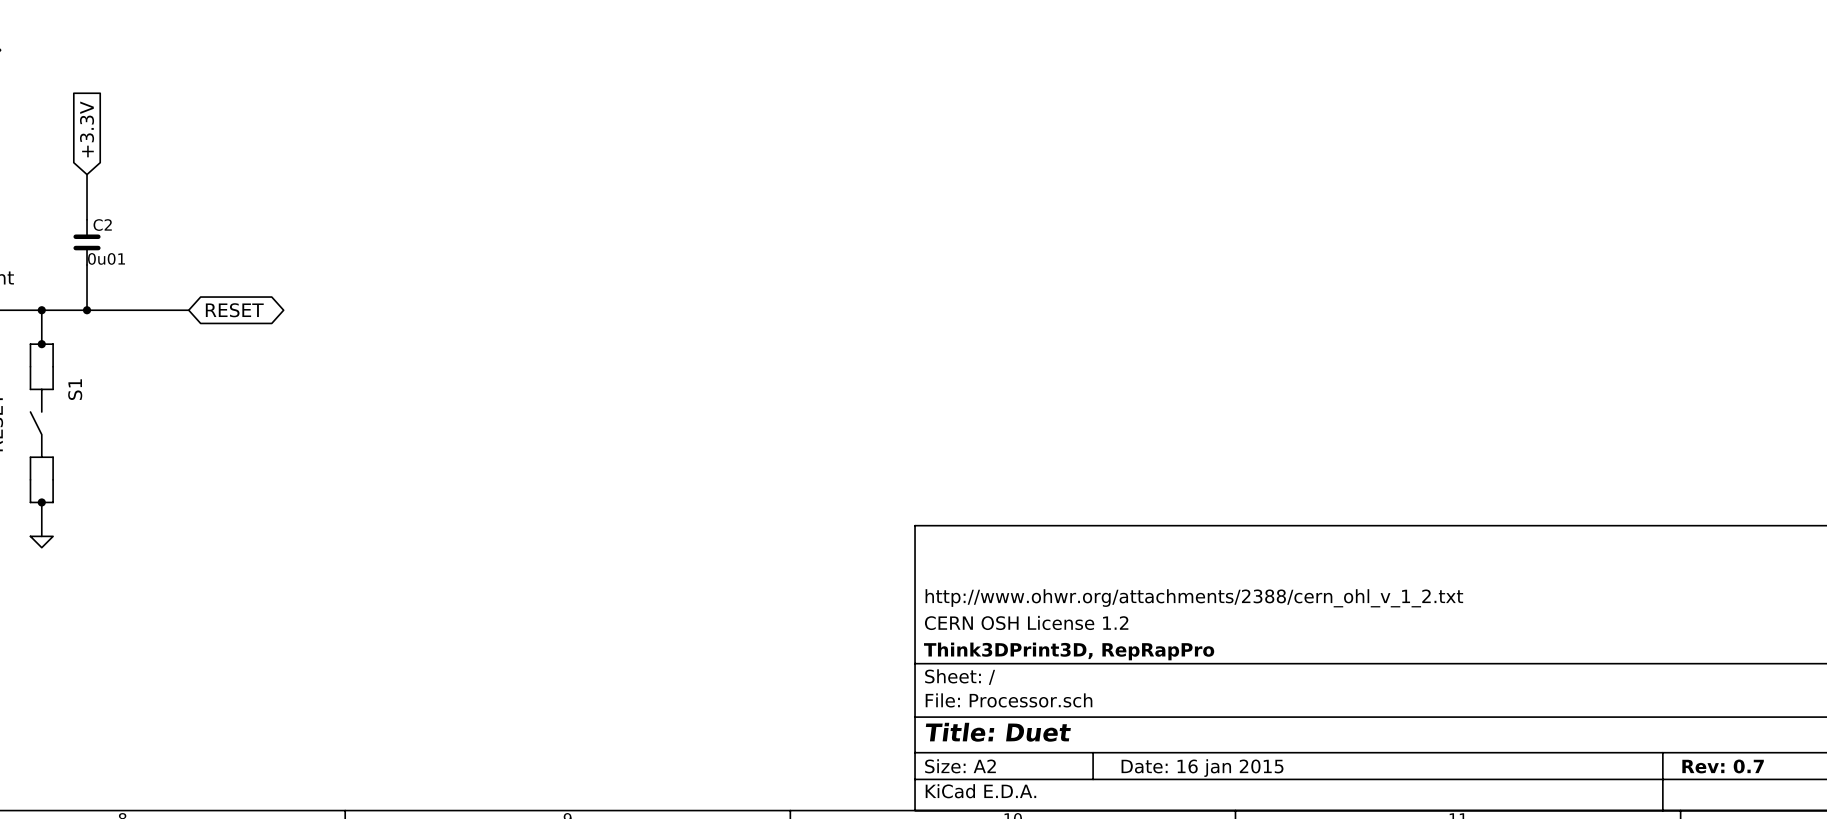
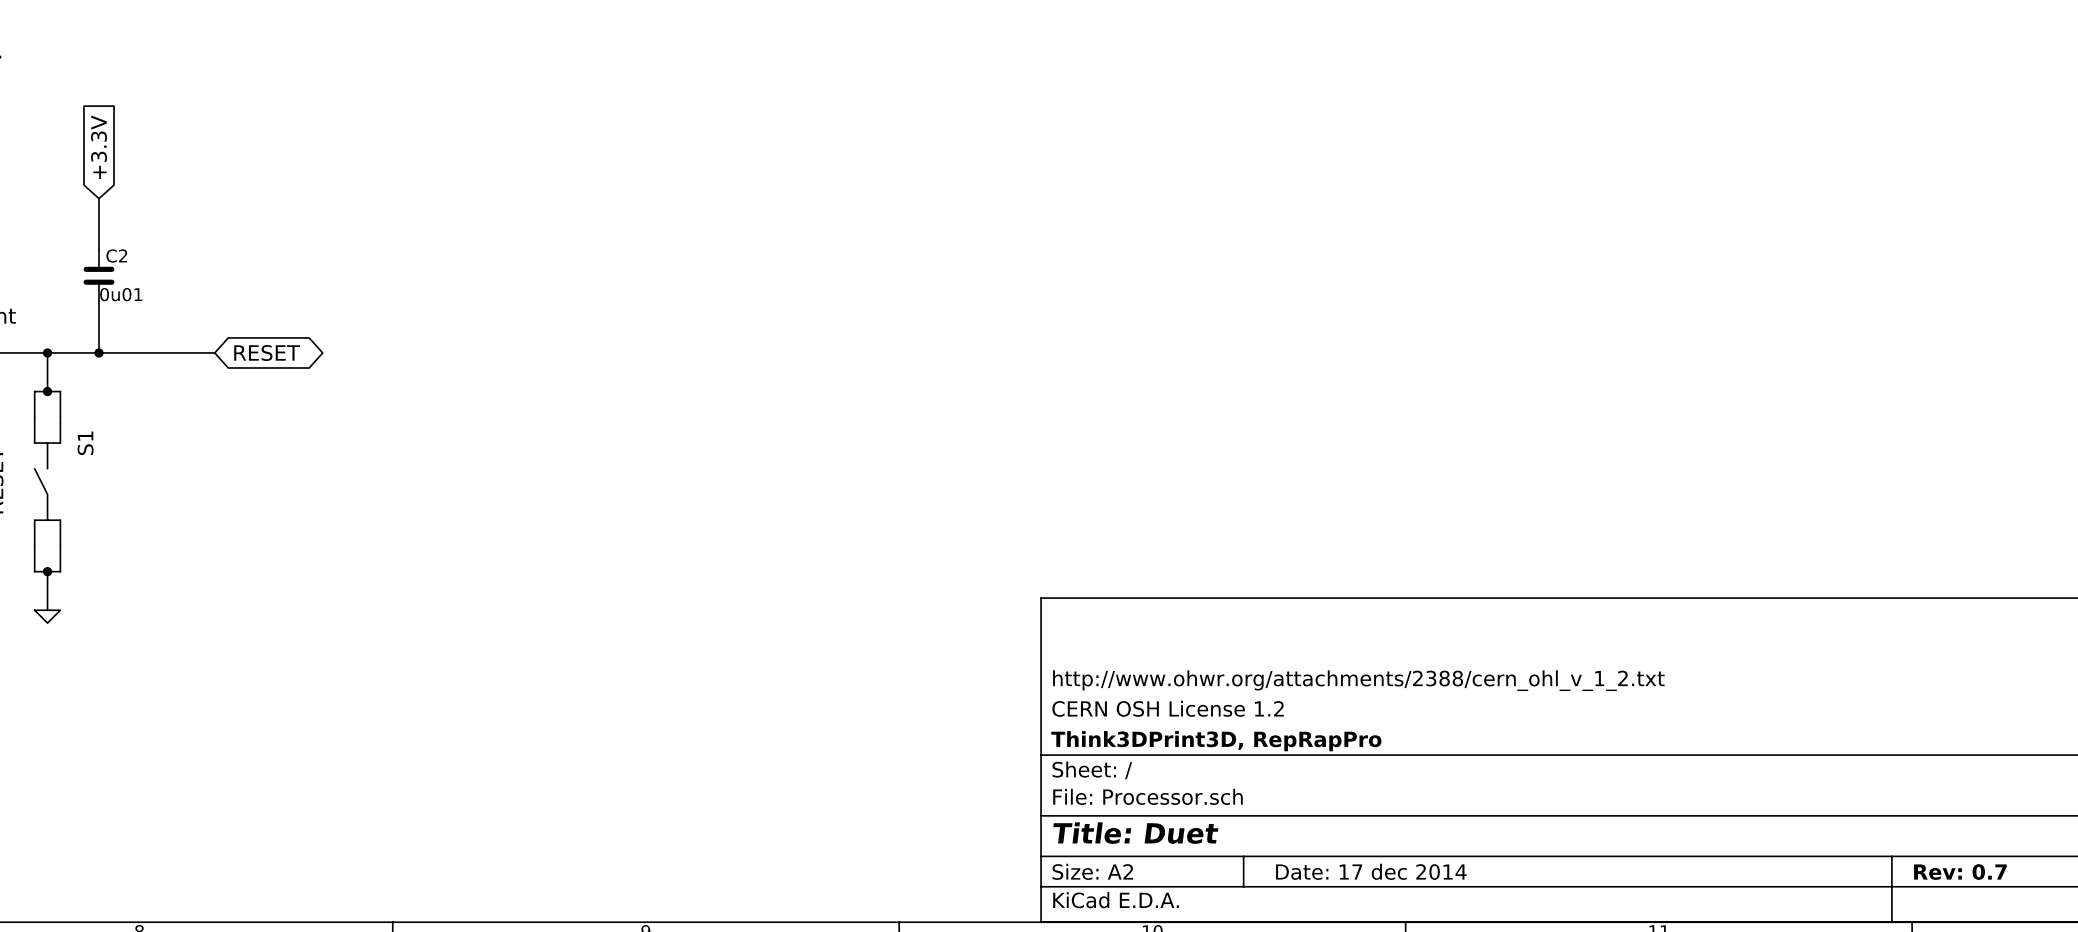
title block: Date: 16 jan 2015 (1202, 768) -> Date: 17 dec 2014 (1371, 871)

